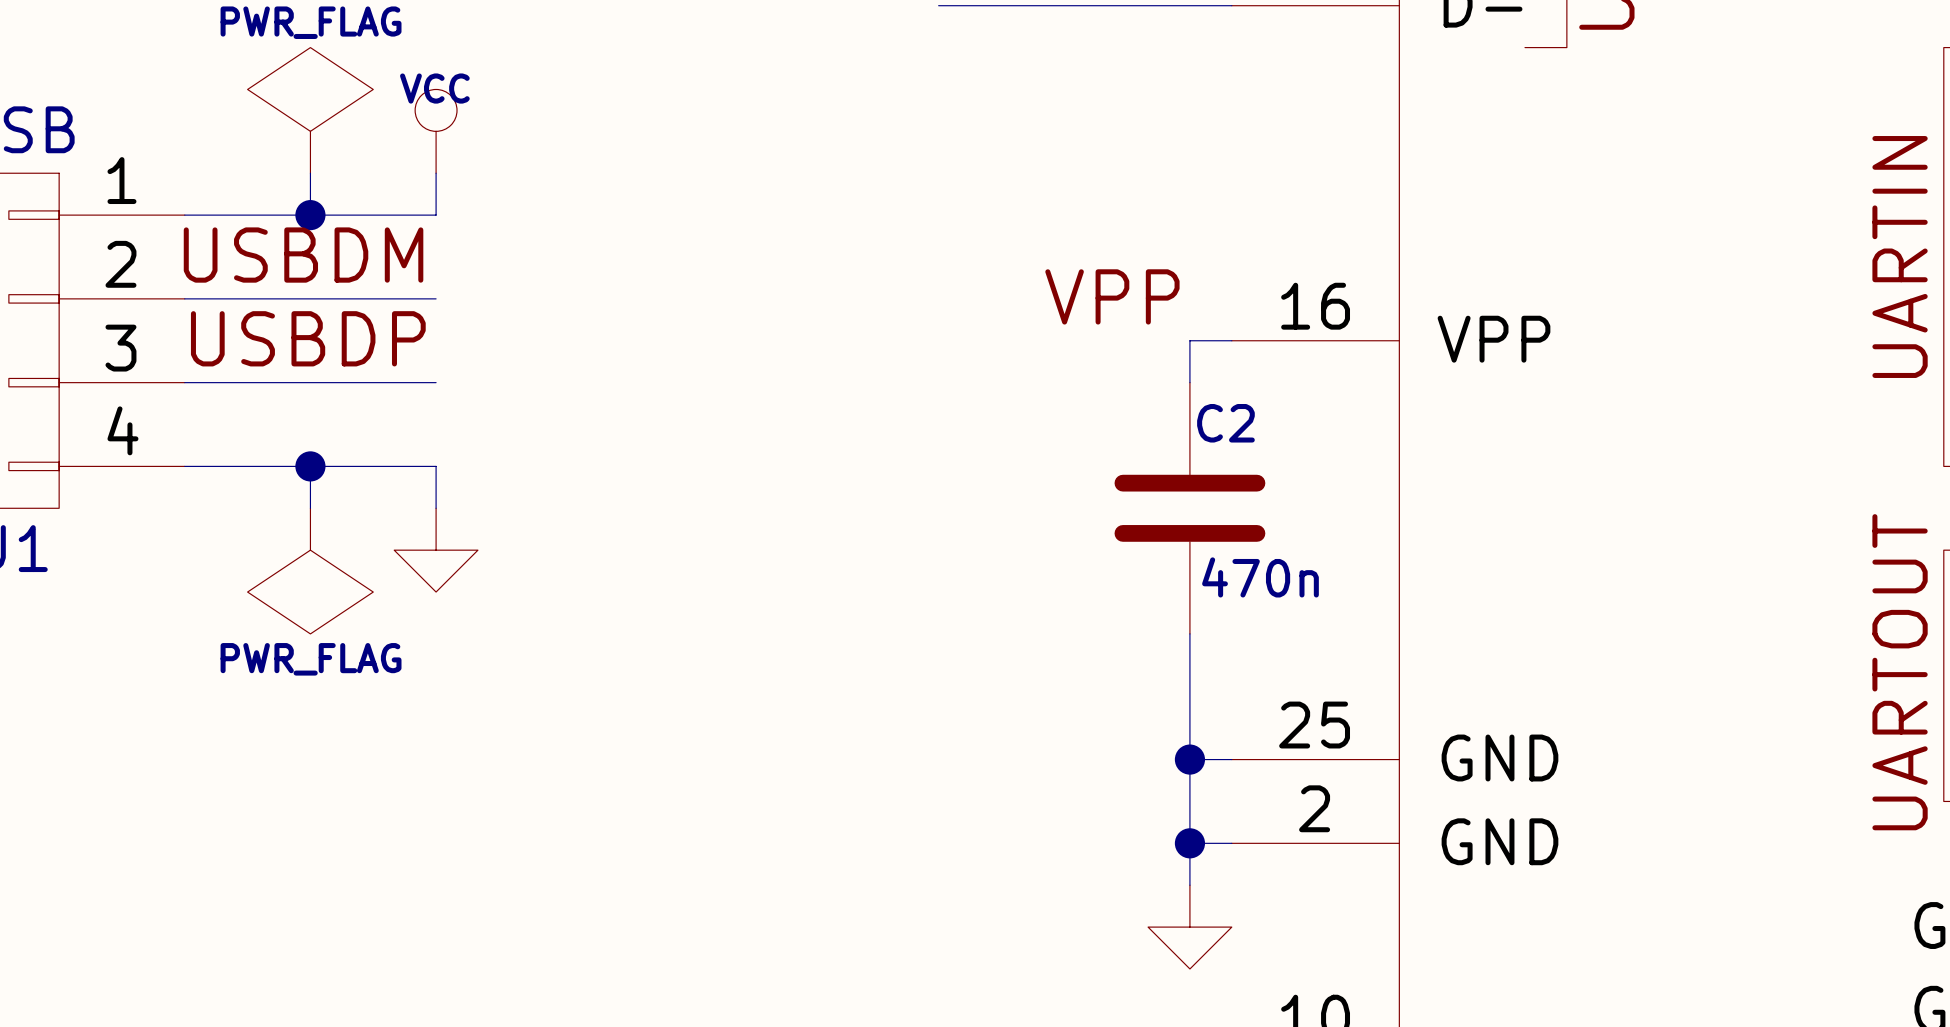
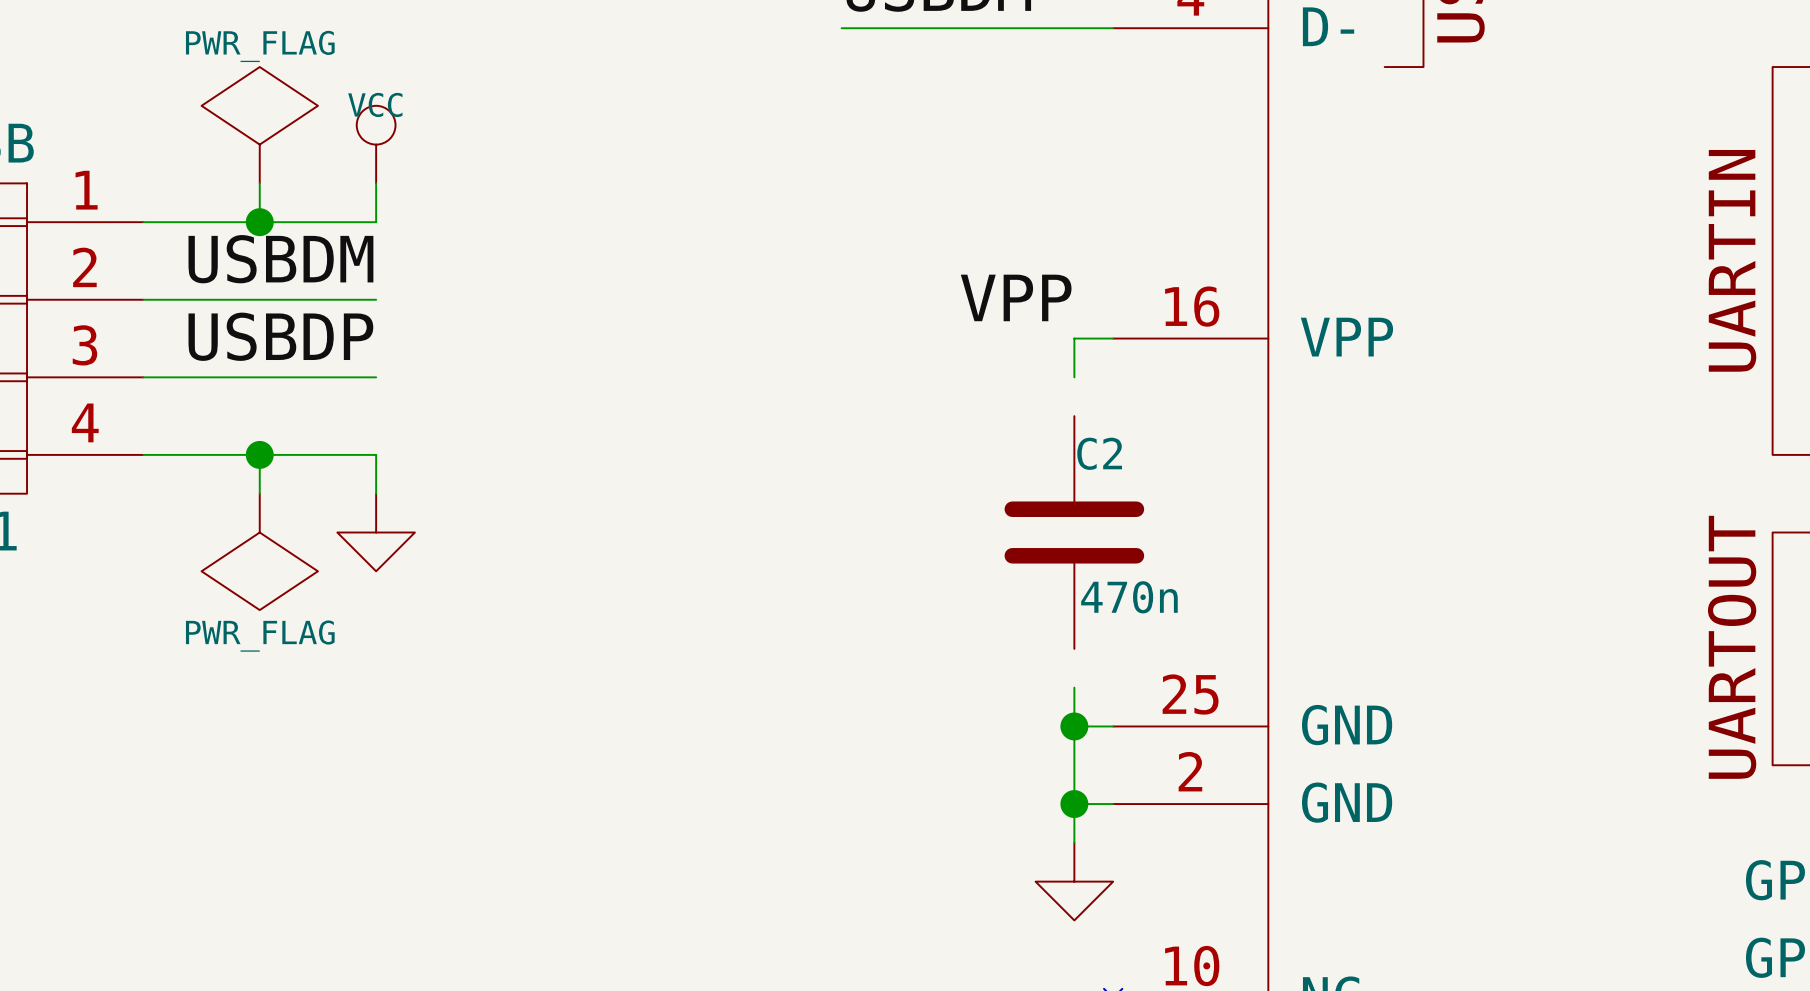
C2 position: (1189, 508) -> (1074, 532)
wire: (1189, 633) (1189, 717) -> none

